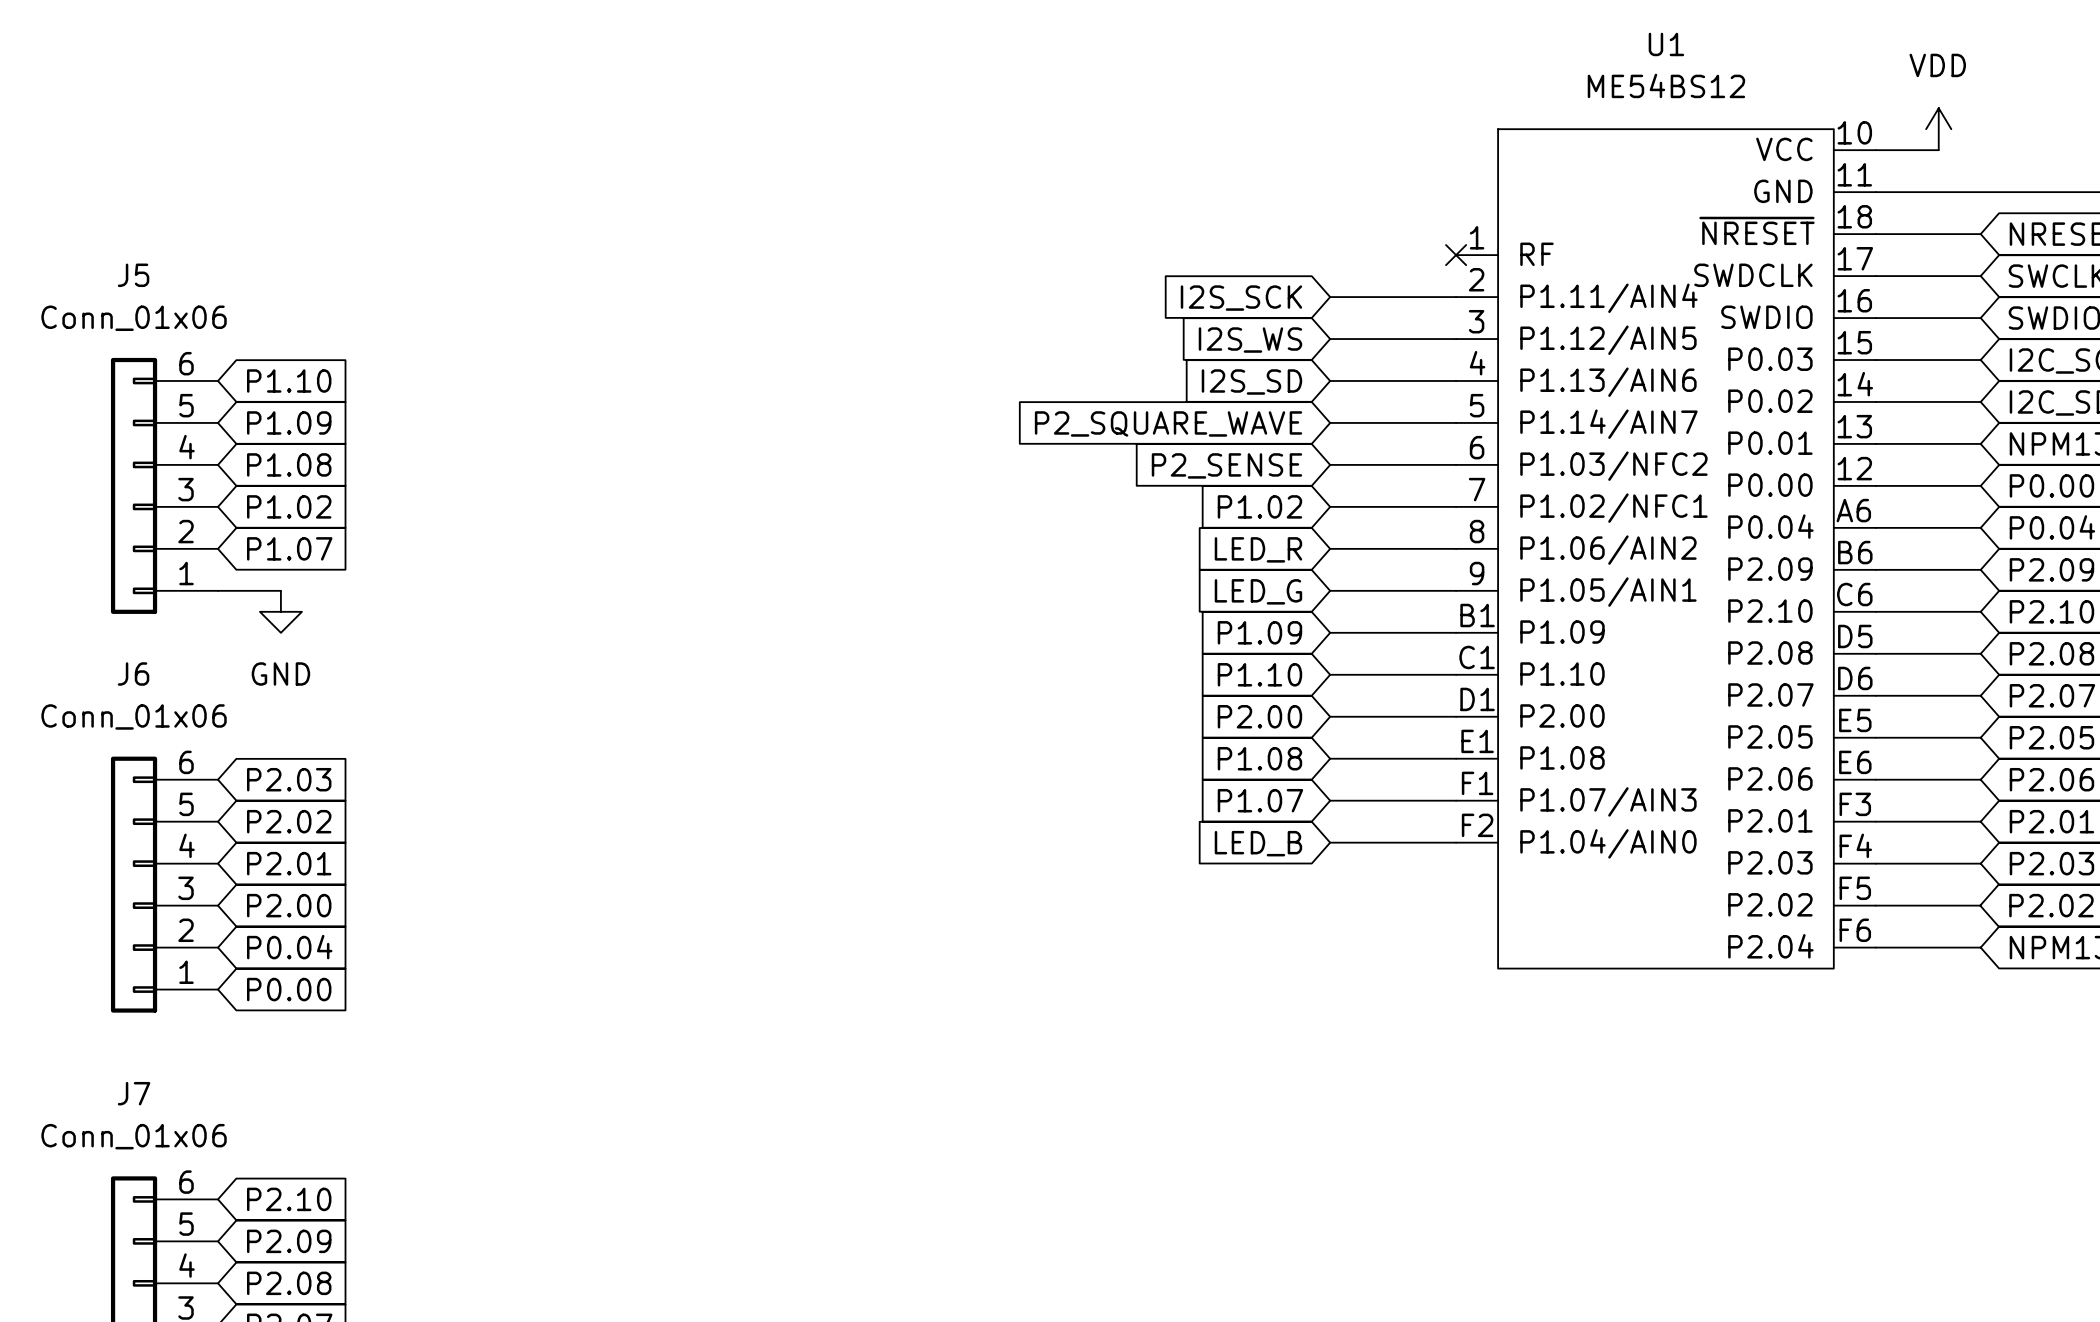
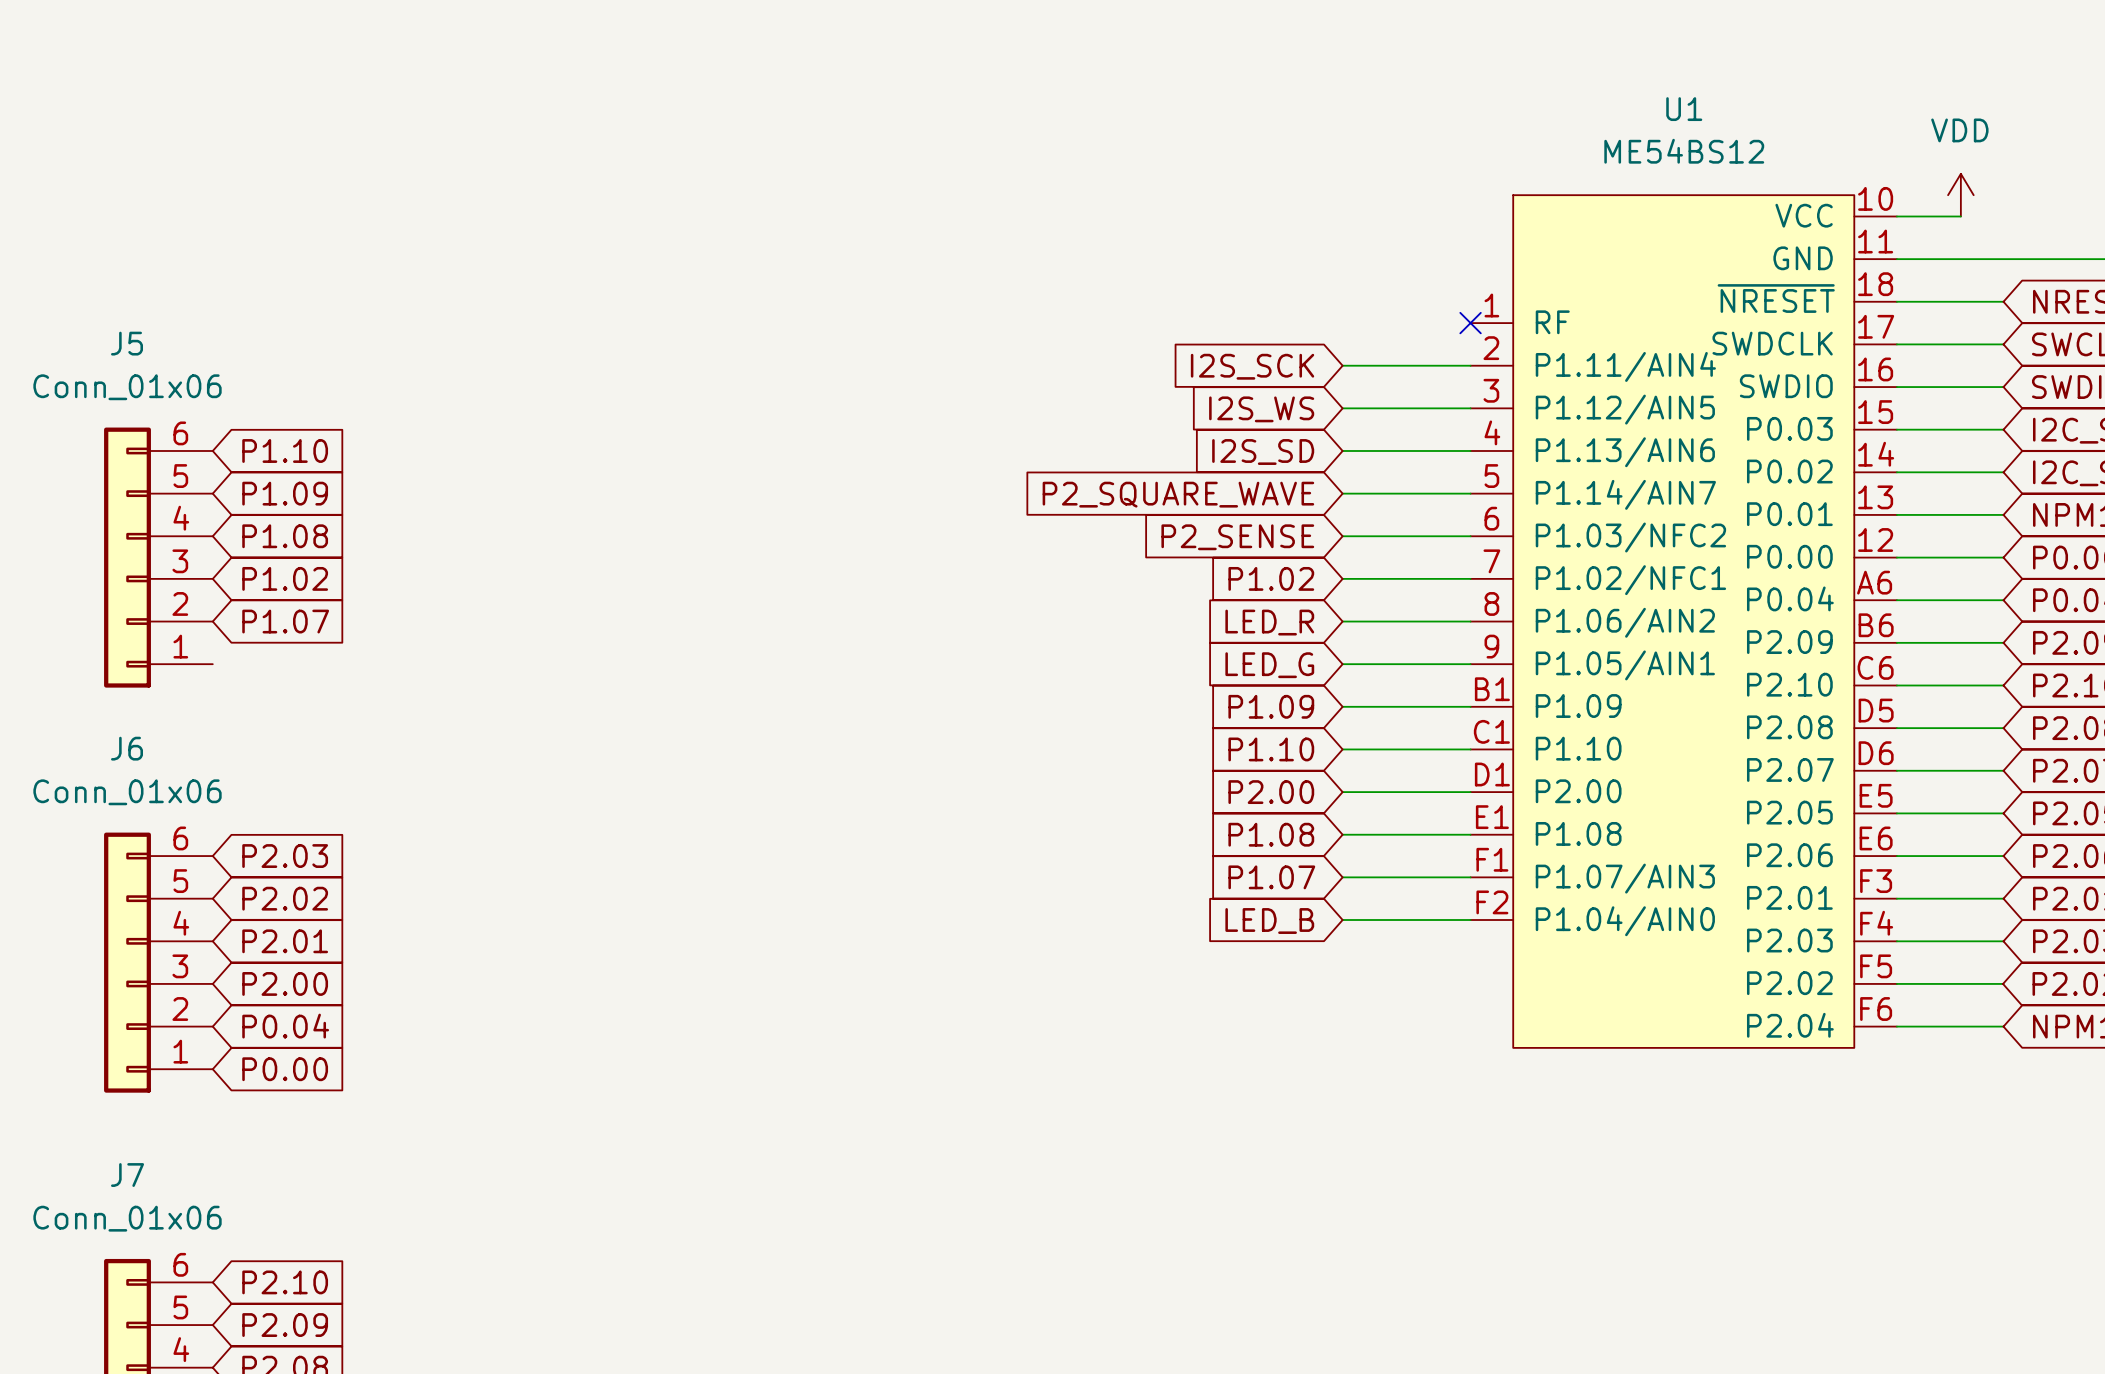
wire: (217, 590) (280, 590) -> none
power symbol: GND (280, 611) -> none

